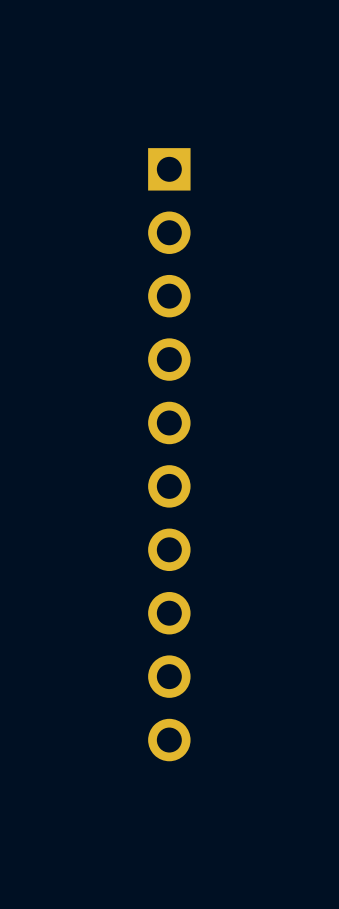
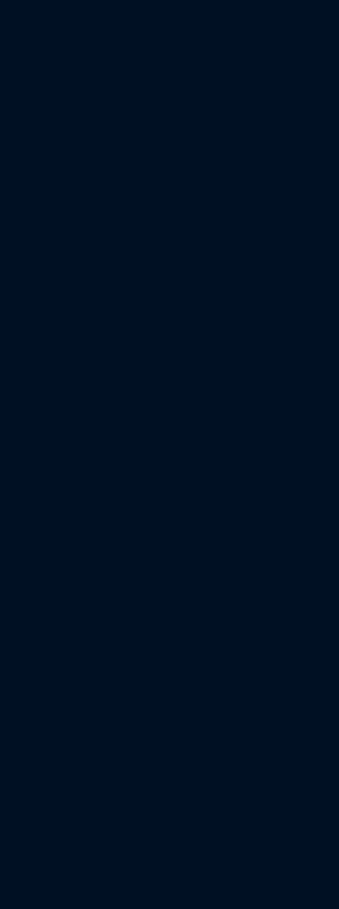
part: (169, 454) -> none

